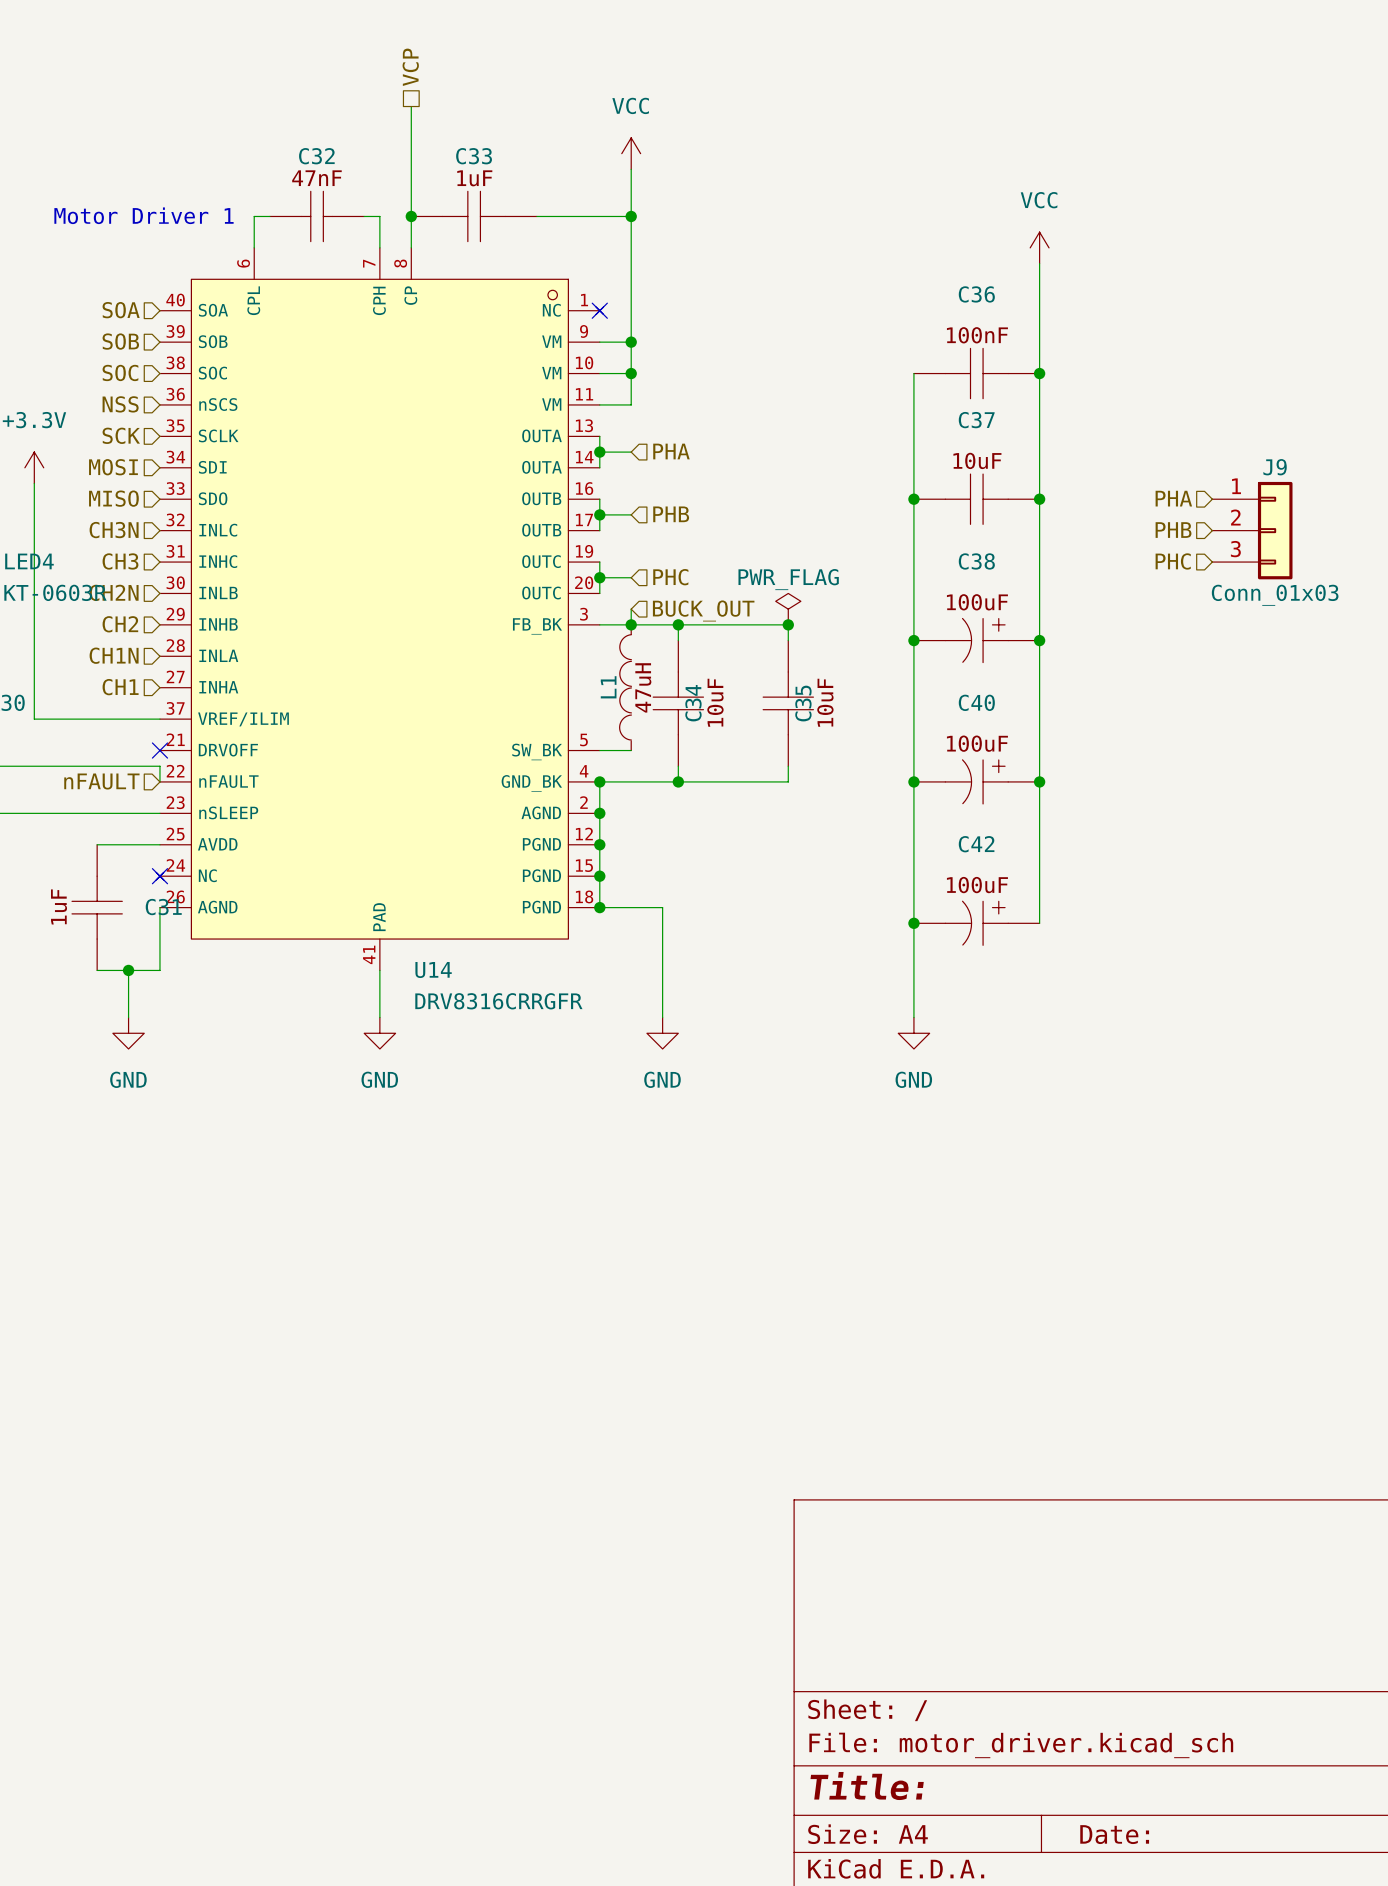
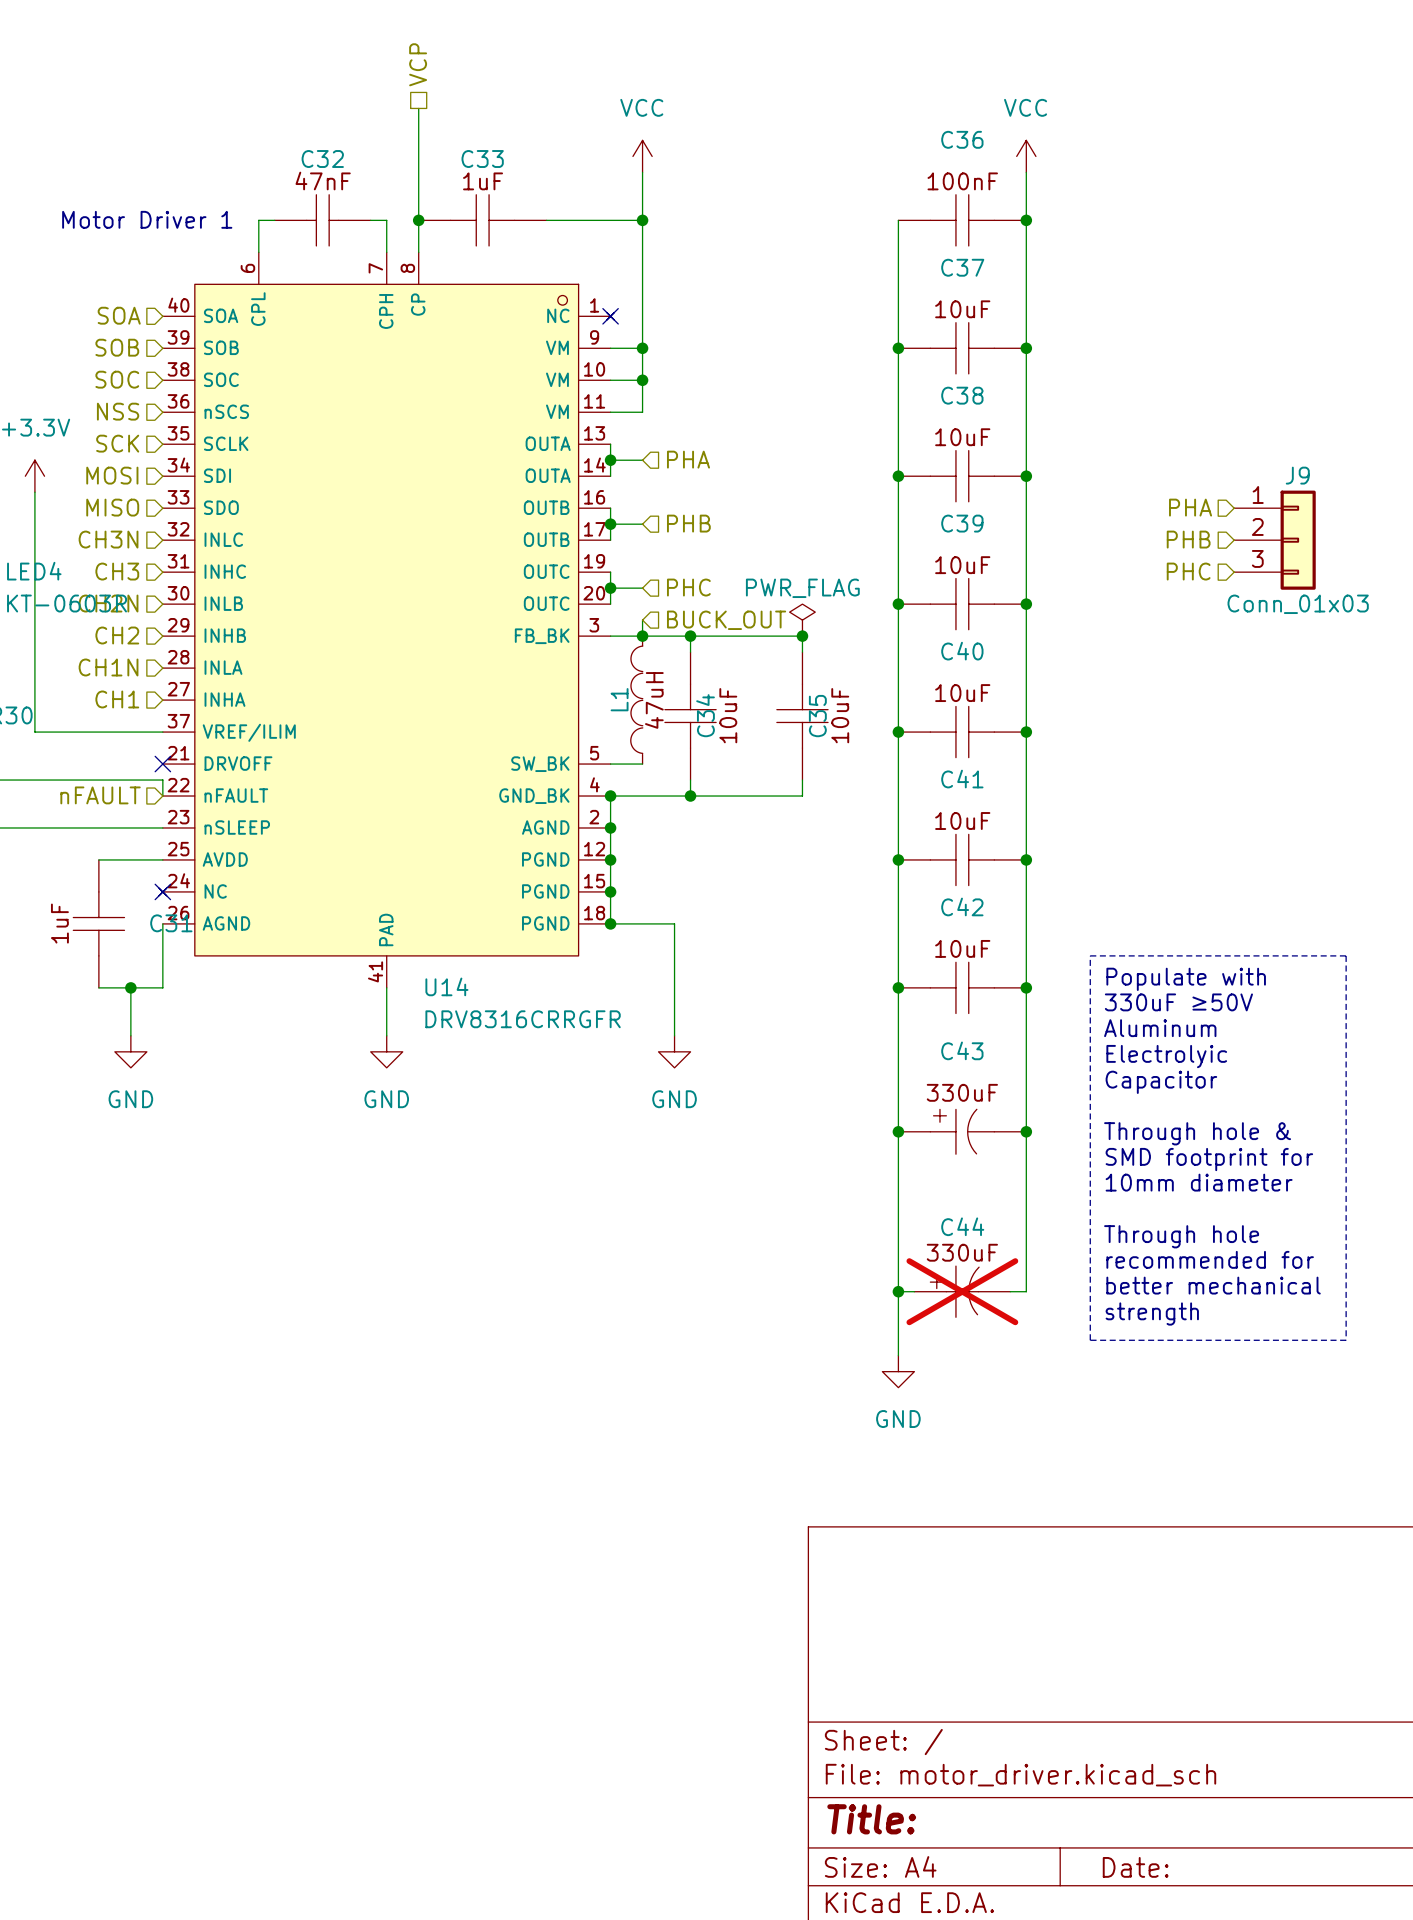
wire: none -> (1026, 172) (1026, 1291) (1010, 1291)
wire: none -> (898, 220) (898, 1355)
junction: none -> (1026, 220)
power symbol position: VCC (1039, 247) -> VCC (1026, 156)
wire: (1039, 263) (1039, 923) -> none
junction: none -> (898, 348)
wire: (913, 373) (913, 1017) -> none
C36 position: (976, 373) -> (962, 220)
junction position: (1039, 373) -> (1026, 348)
junction position: (913, 499) -> (898, 476)
C37 position: (976, 499) -> (962, 348)
junction position: (1039, 499) -> (1026, 476)
junction: none -> (898, 604)
C39: none -> (962, 604)
junction: none -> (1026, 604)
C38 symbol: [913, 618, 1040, 663] -> [898, 450, 1027, 502]
junction: (913, 640) -> none
junction: (1039, 640) -> none
junction: none -> (898, 732)
junction: none -> (1026, 732)
C40 symbol: [913, 759, 1040, 804] -> [898, 706, 1027, 758]
junction: (913, 781) -> none
junction: (1039, 781) -> none
junction: none -> (898, 859)
C41: none -> (962, 859)
junction: none -> (1026, 859)
C42 symbol: [913, 901, 1040, 946] -> [898, 962, 1027, 1014]
junction: (913, 923) -> none
line: none -> (1090, 955) (1346, 955) (1346, 1340) (1090, 1340) (1090, 955)
text: none -> Populate with (1186, 979)
junction: none -> (898, 987)
junction: none -> (1026, 987)
text: none -> 330uF ≥50V (1178, 1002)
text: none -> Aluminum (1160, 1028)
power symbol: GND (913, 1033) -> none
text: none -> Electrolyic (1166, 1056)
text: none -> Capacitor (1161, 1082)
junction: none -> (898, 1131)
C43: none -> (962, 1131)
junction: none -> (1026, 1131)
text: none -> Through hole & (1197, 1133)
text: none -> SMD footprint for (1209, 1159)
text: none -> 10mm diameter (1199, 1182)
text: none -> Through hole (1181, 1236)
text: none -> recommended for (1210, 1259)
text: none -> better mechanical (1213, 1285)
wire: none -> (898, 1291) (914, 1291)
junction: none -> (898, 1291)
C44: none -> (962, 1291)
text: none -> strength (1152, 1314)
power symbol: none -> GND (898, 1371)

